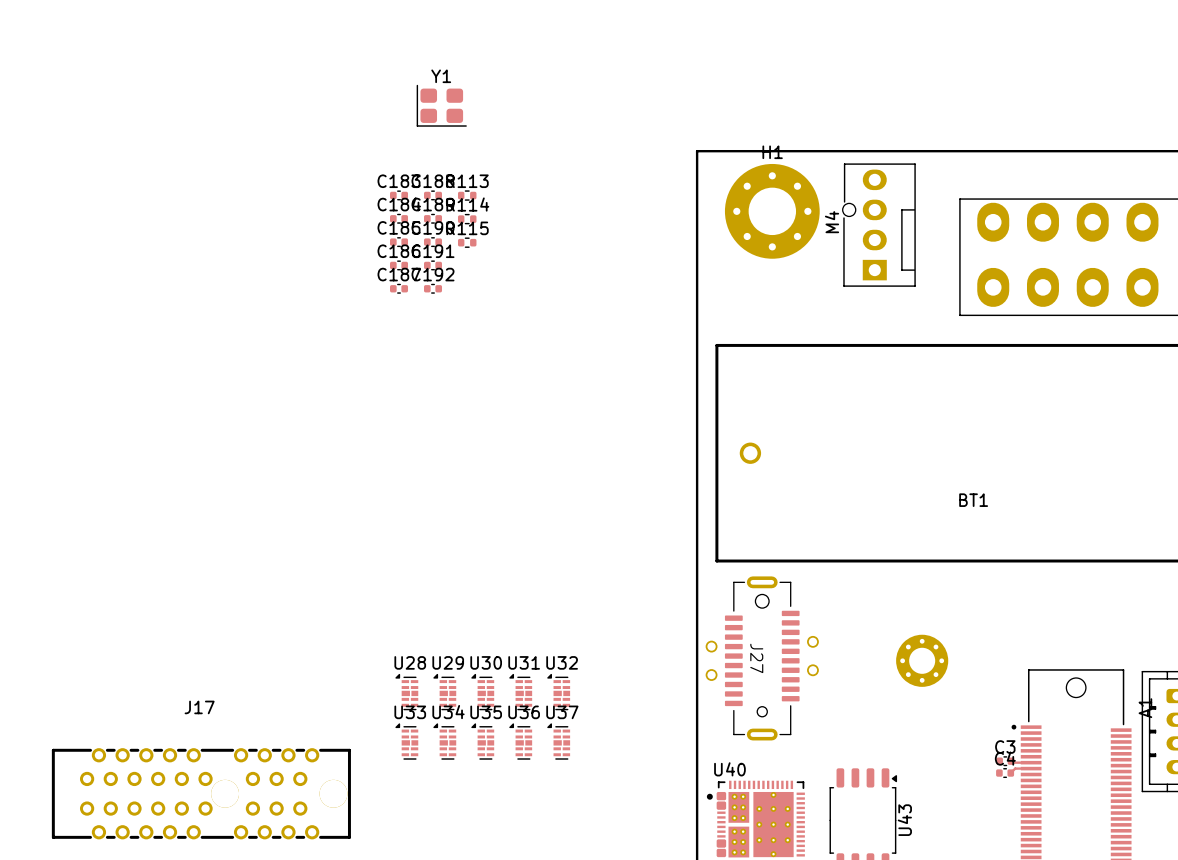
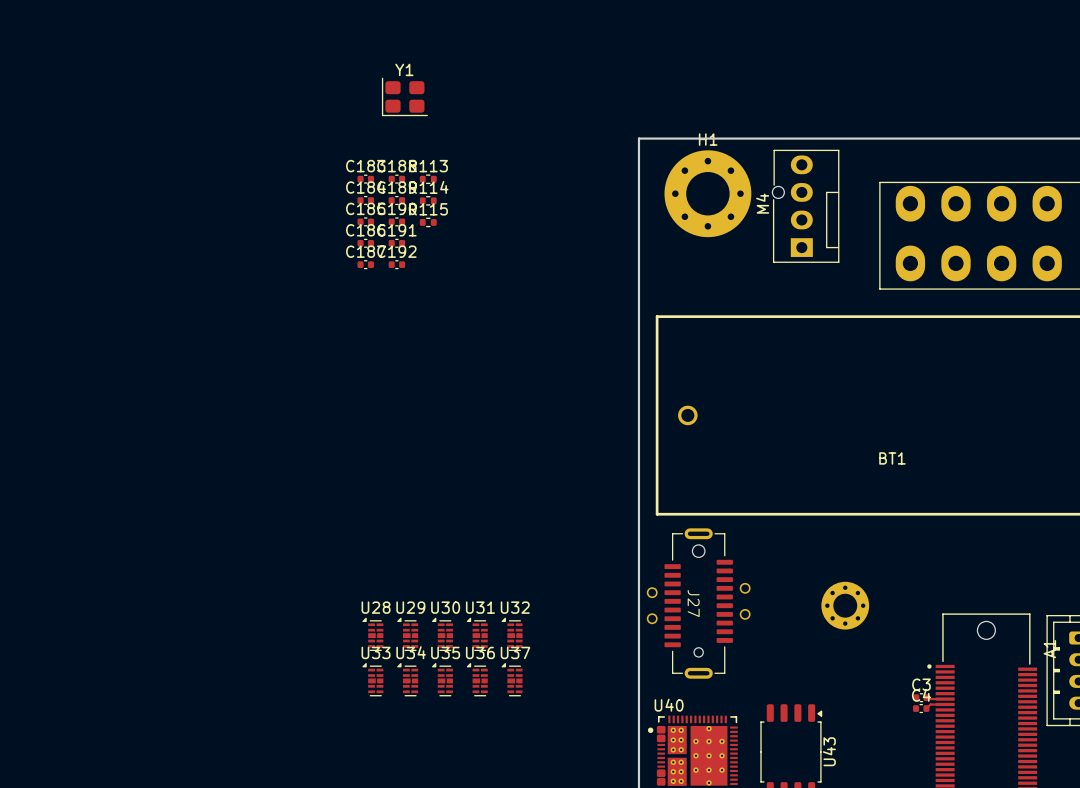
J17: (201, 793) -> none

